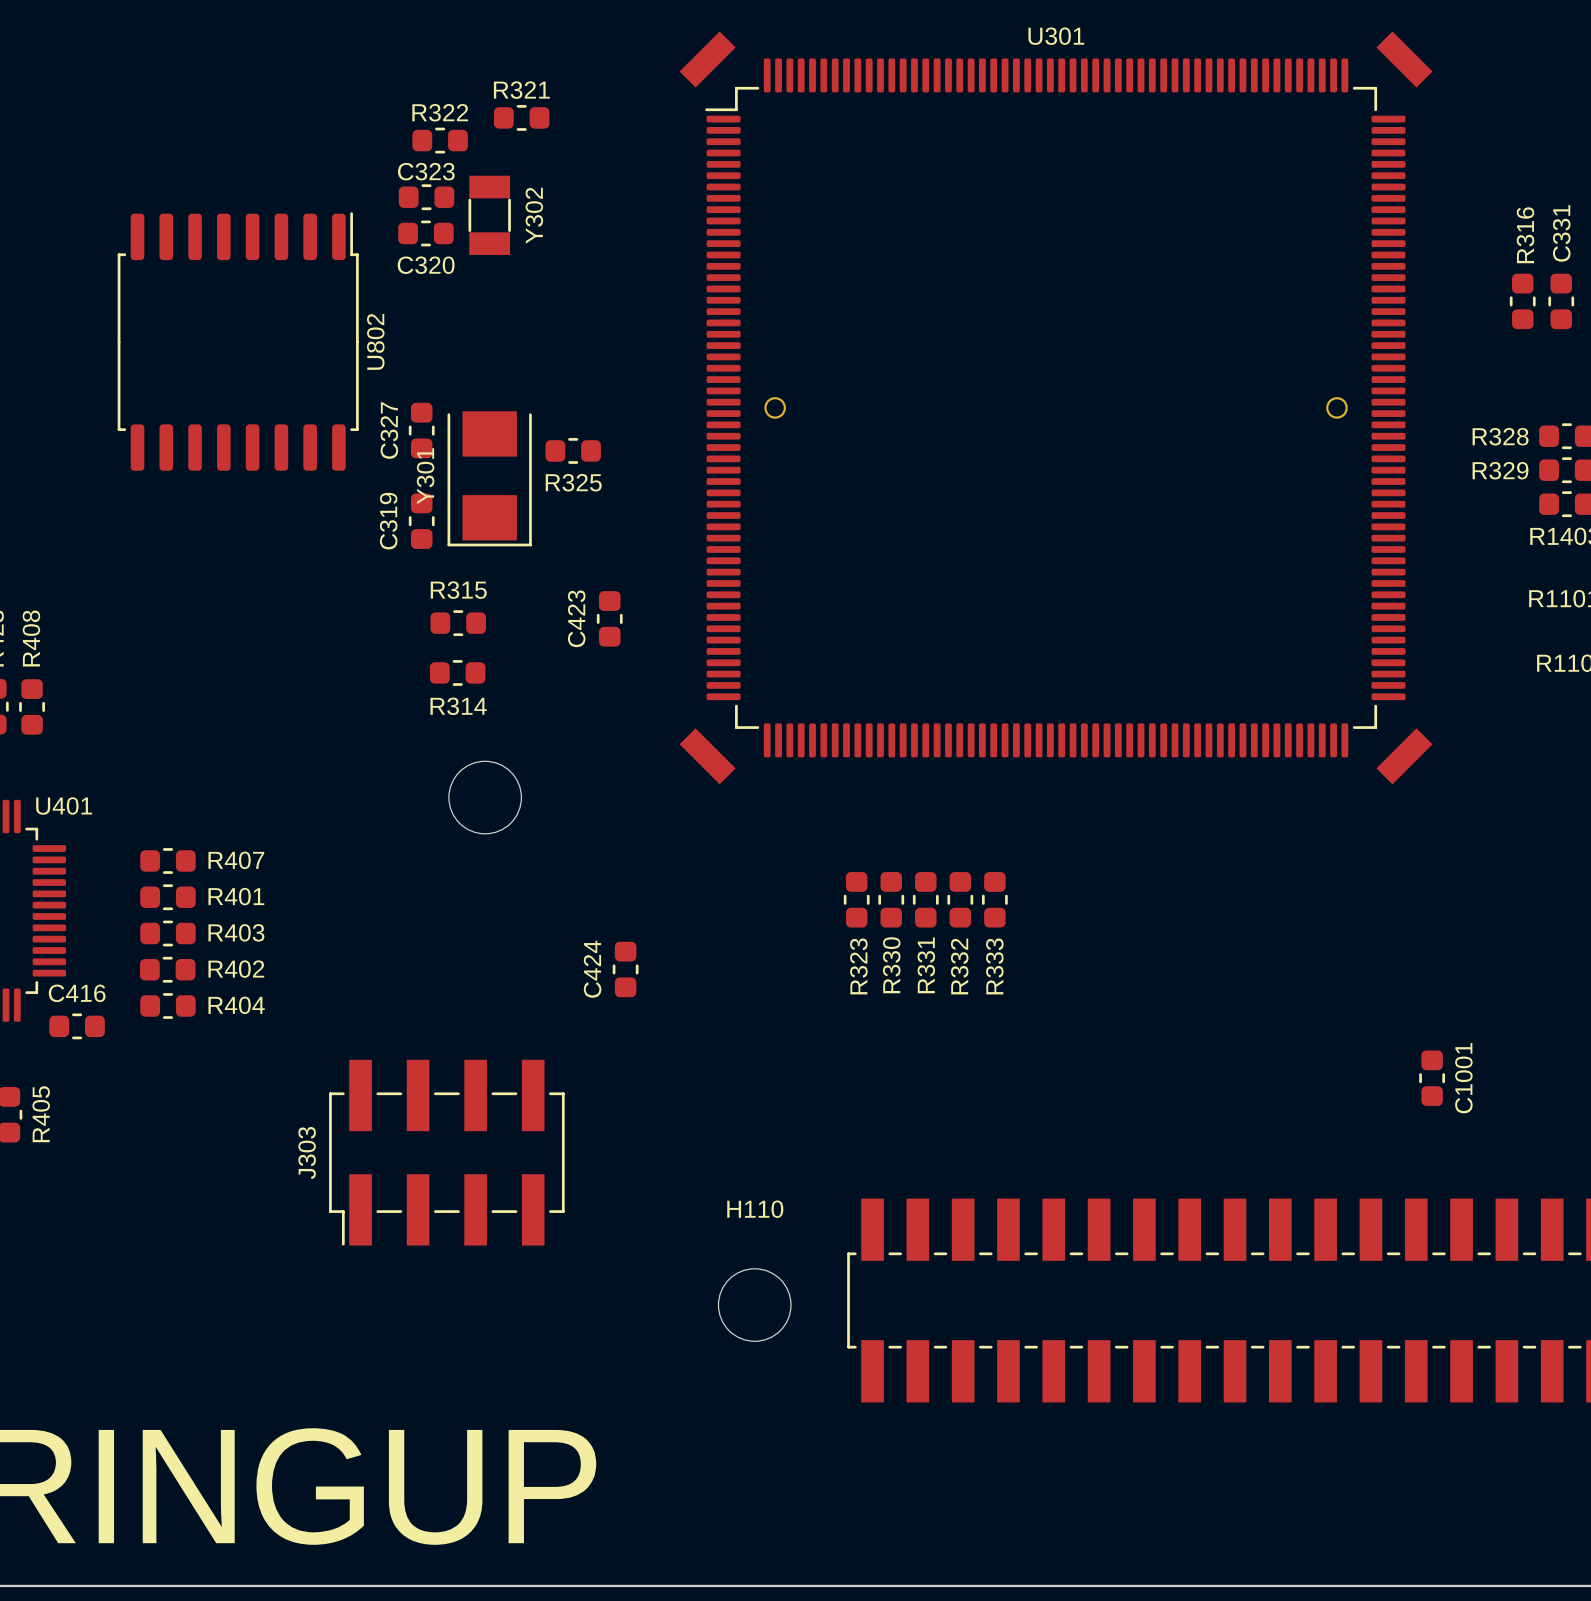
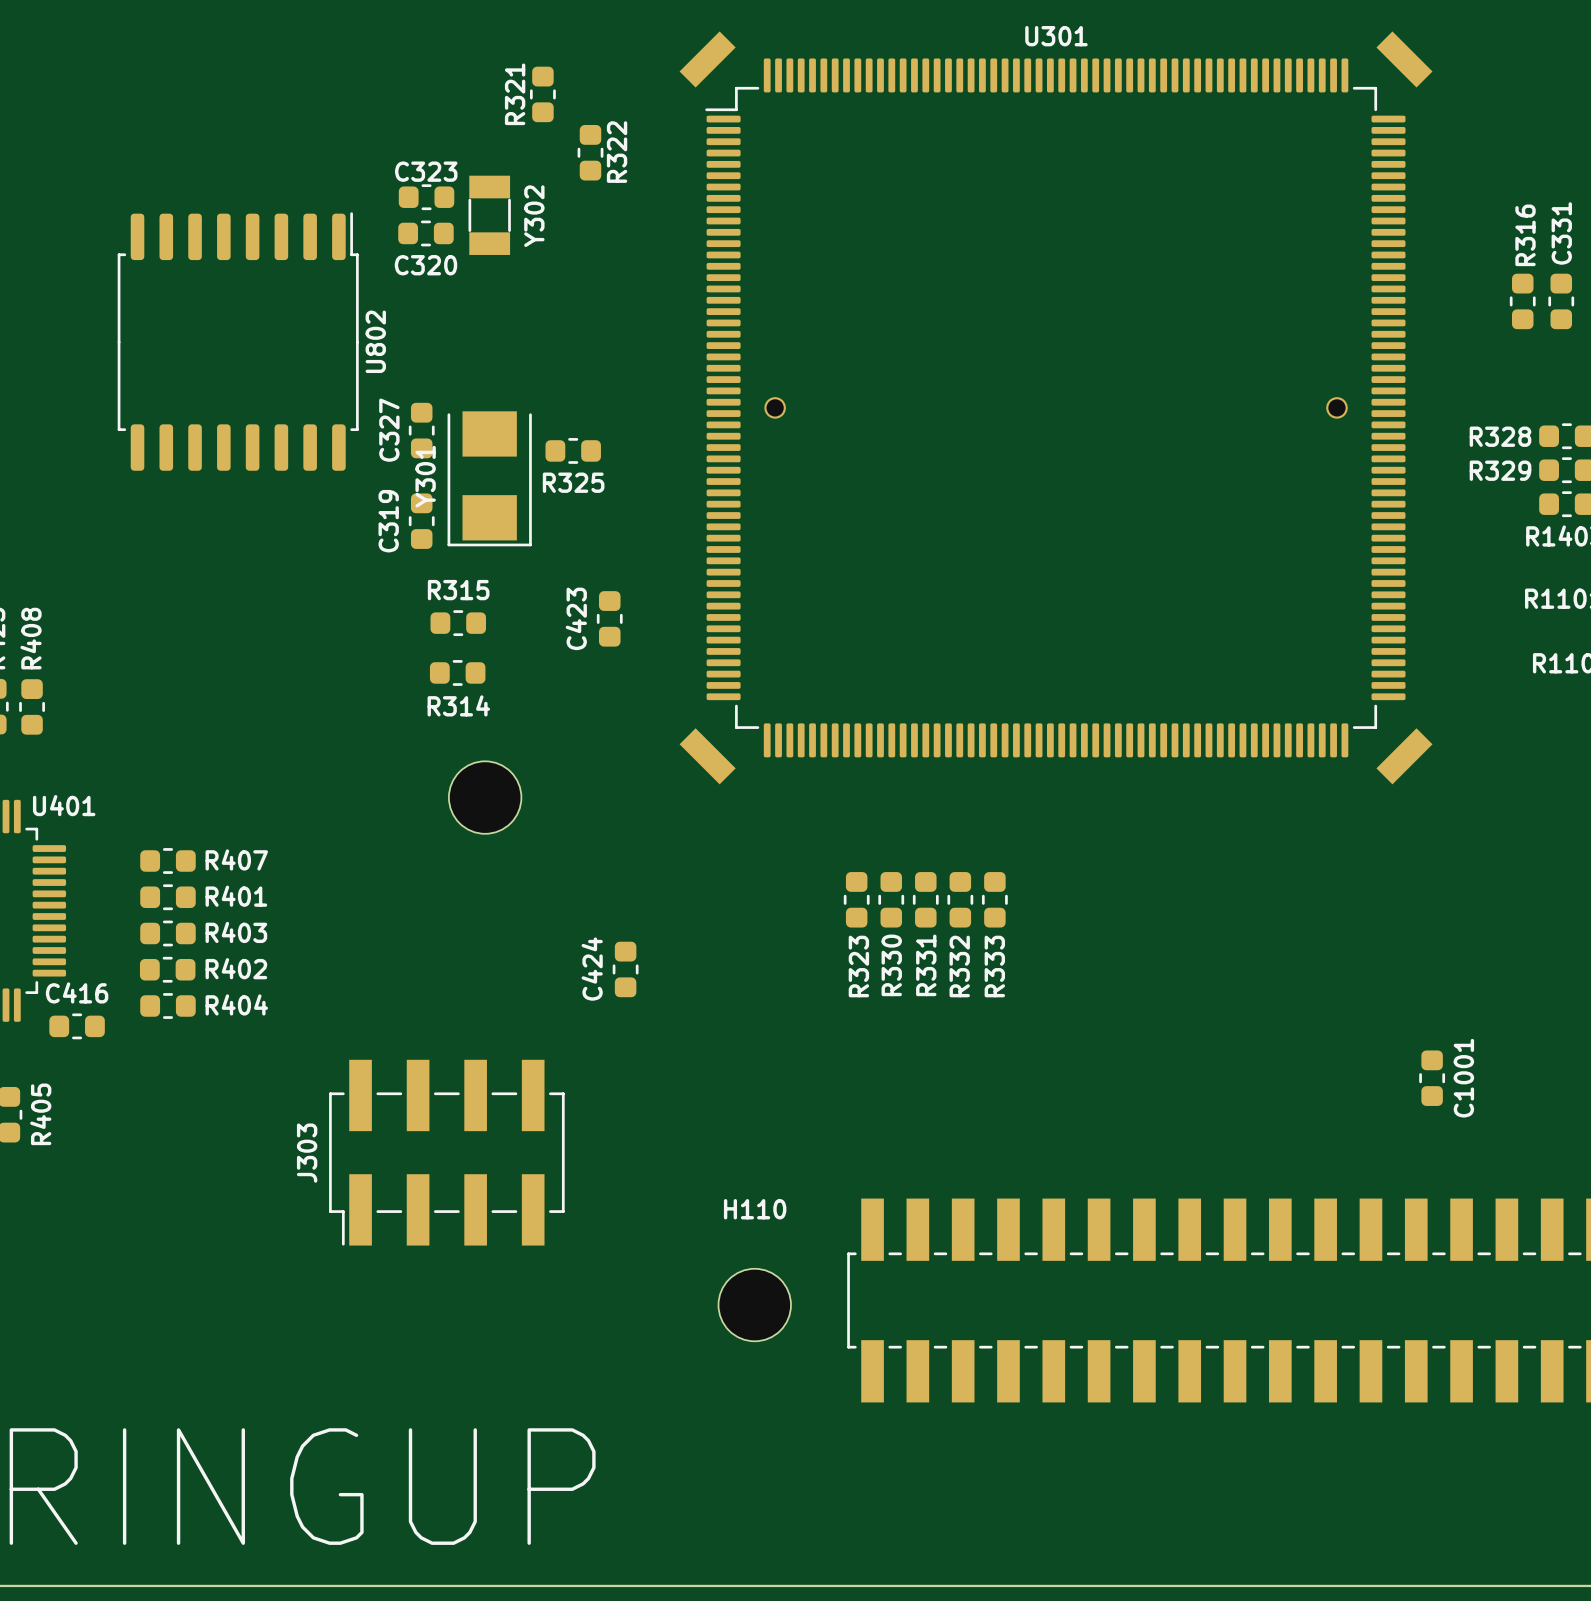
R321 rotation: 0° (521, 117) -> 90° clockwise (542, 94)
R322 rotation: 0° (440, 140) -> 90° clockwise (590, 152)
R322 position: (440, 140) -> (590, 152)

